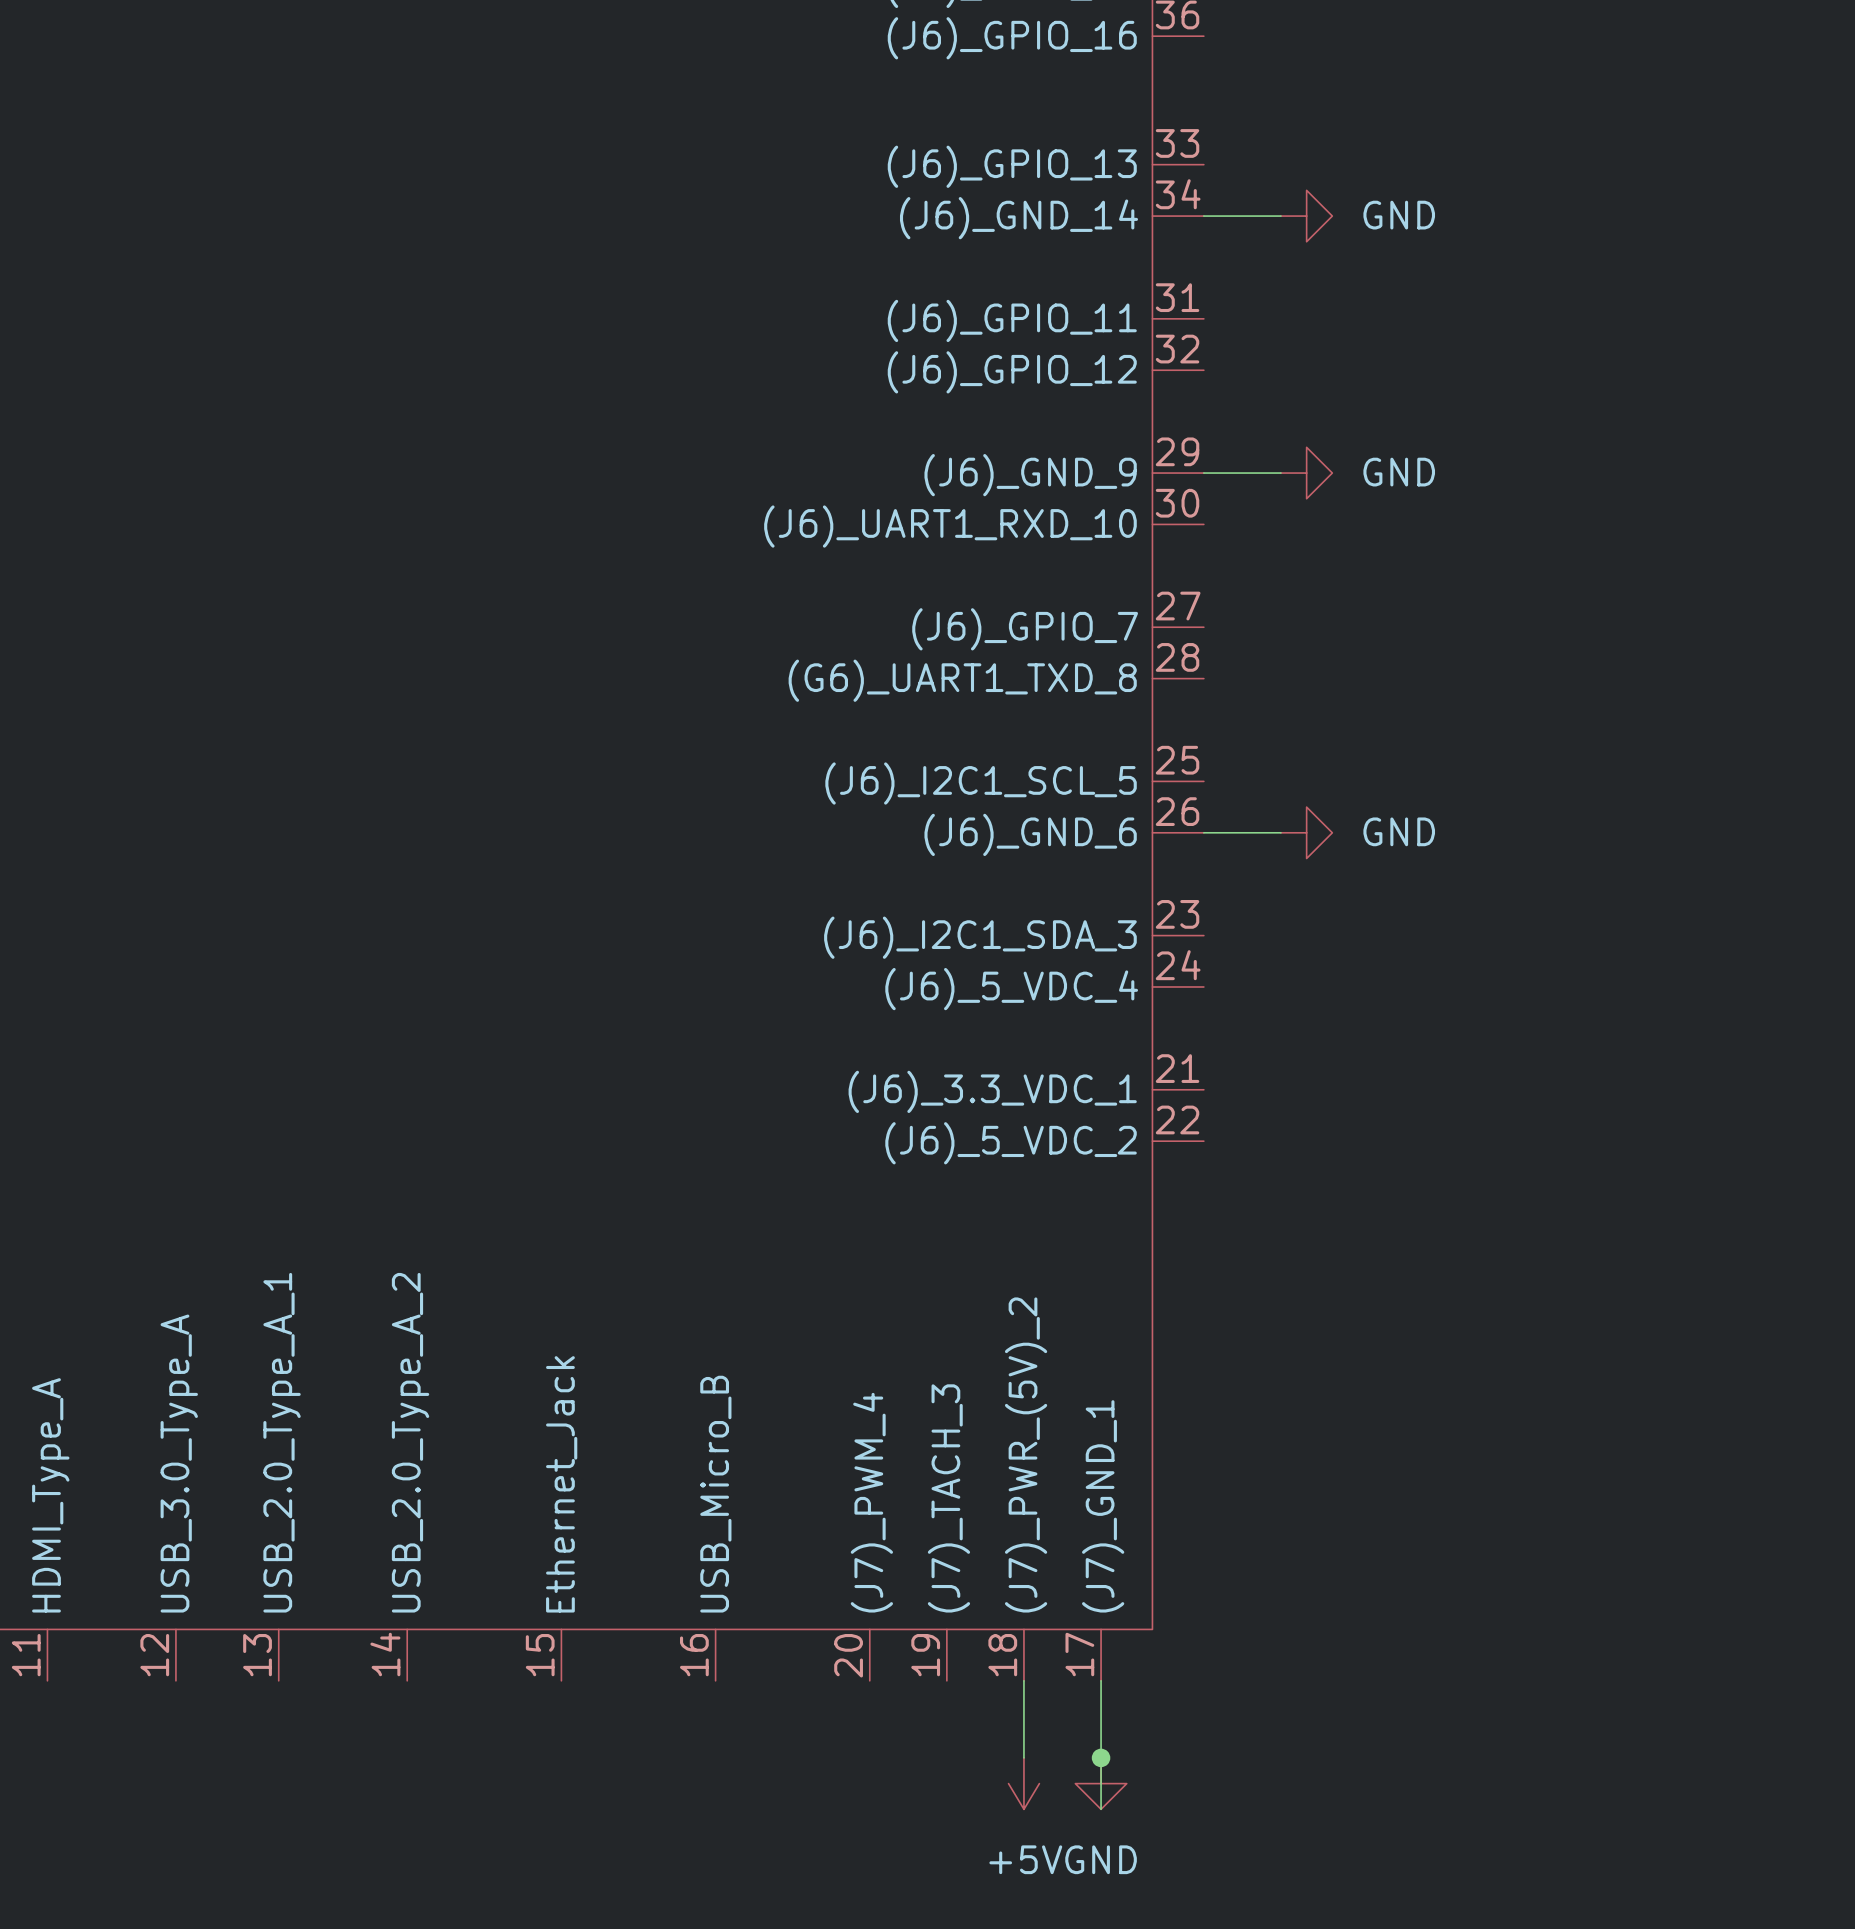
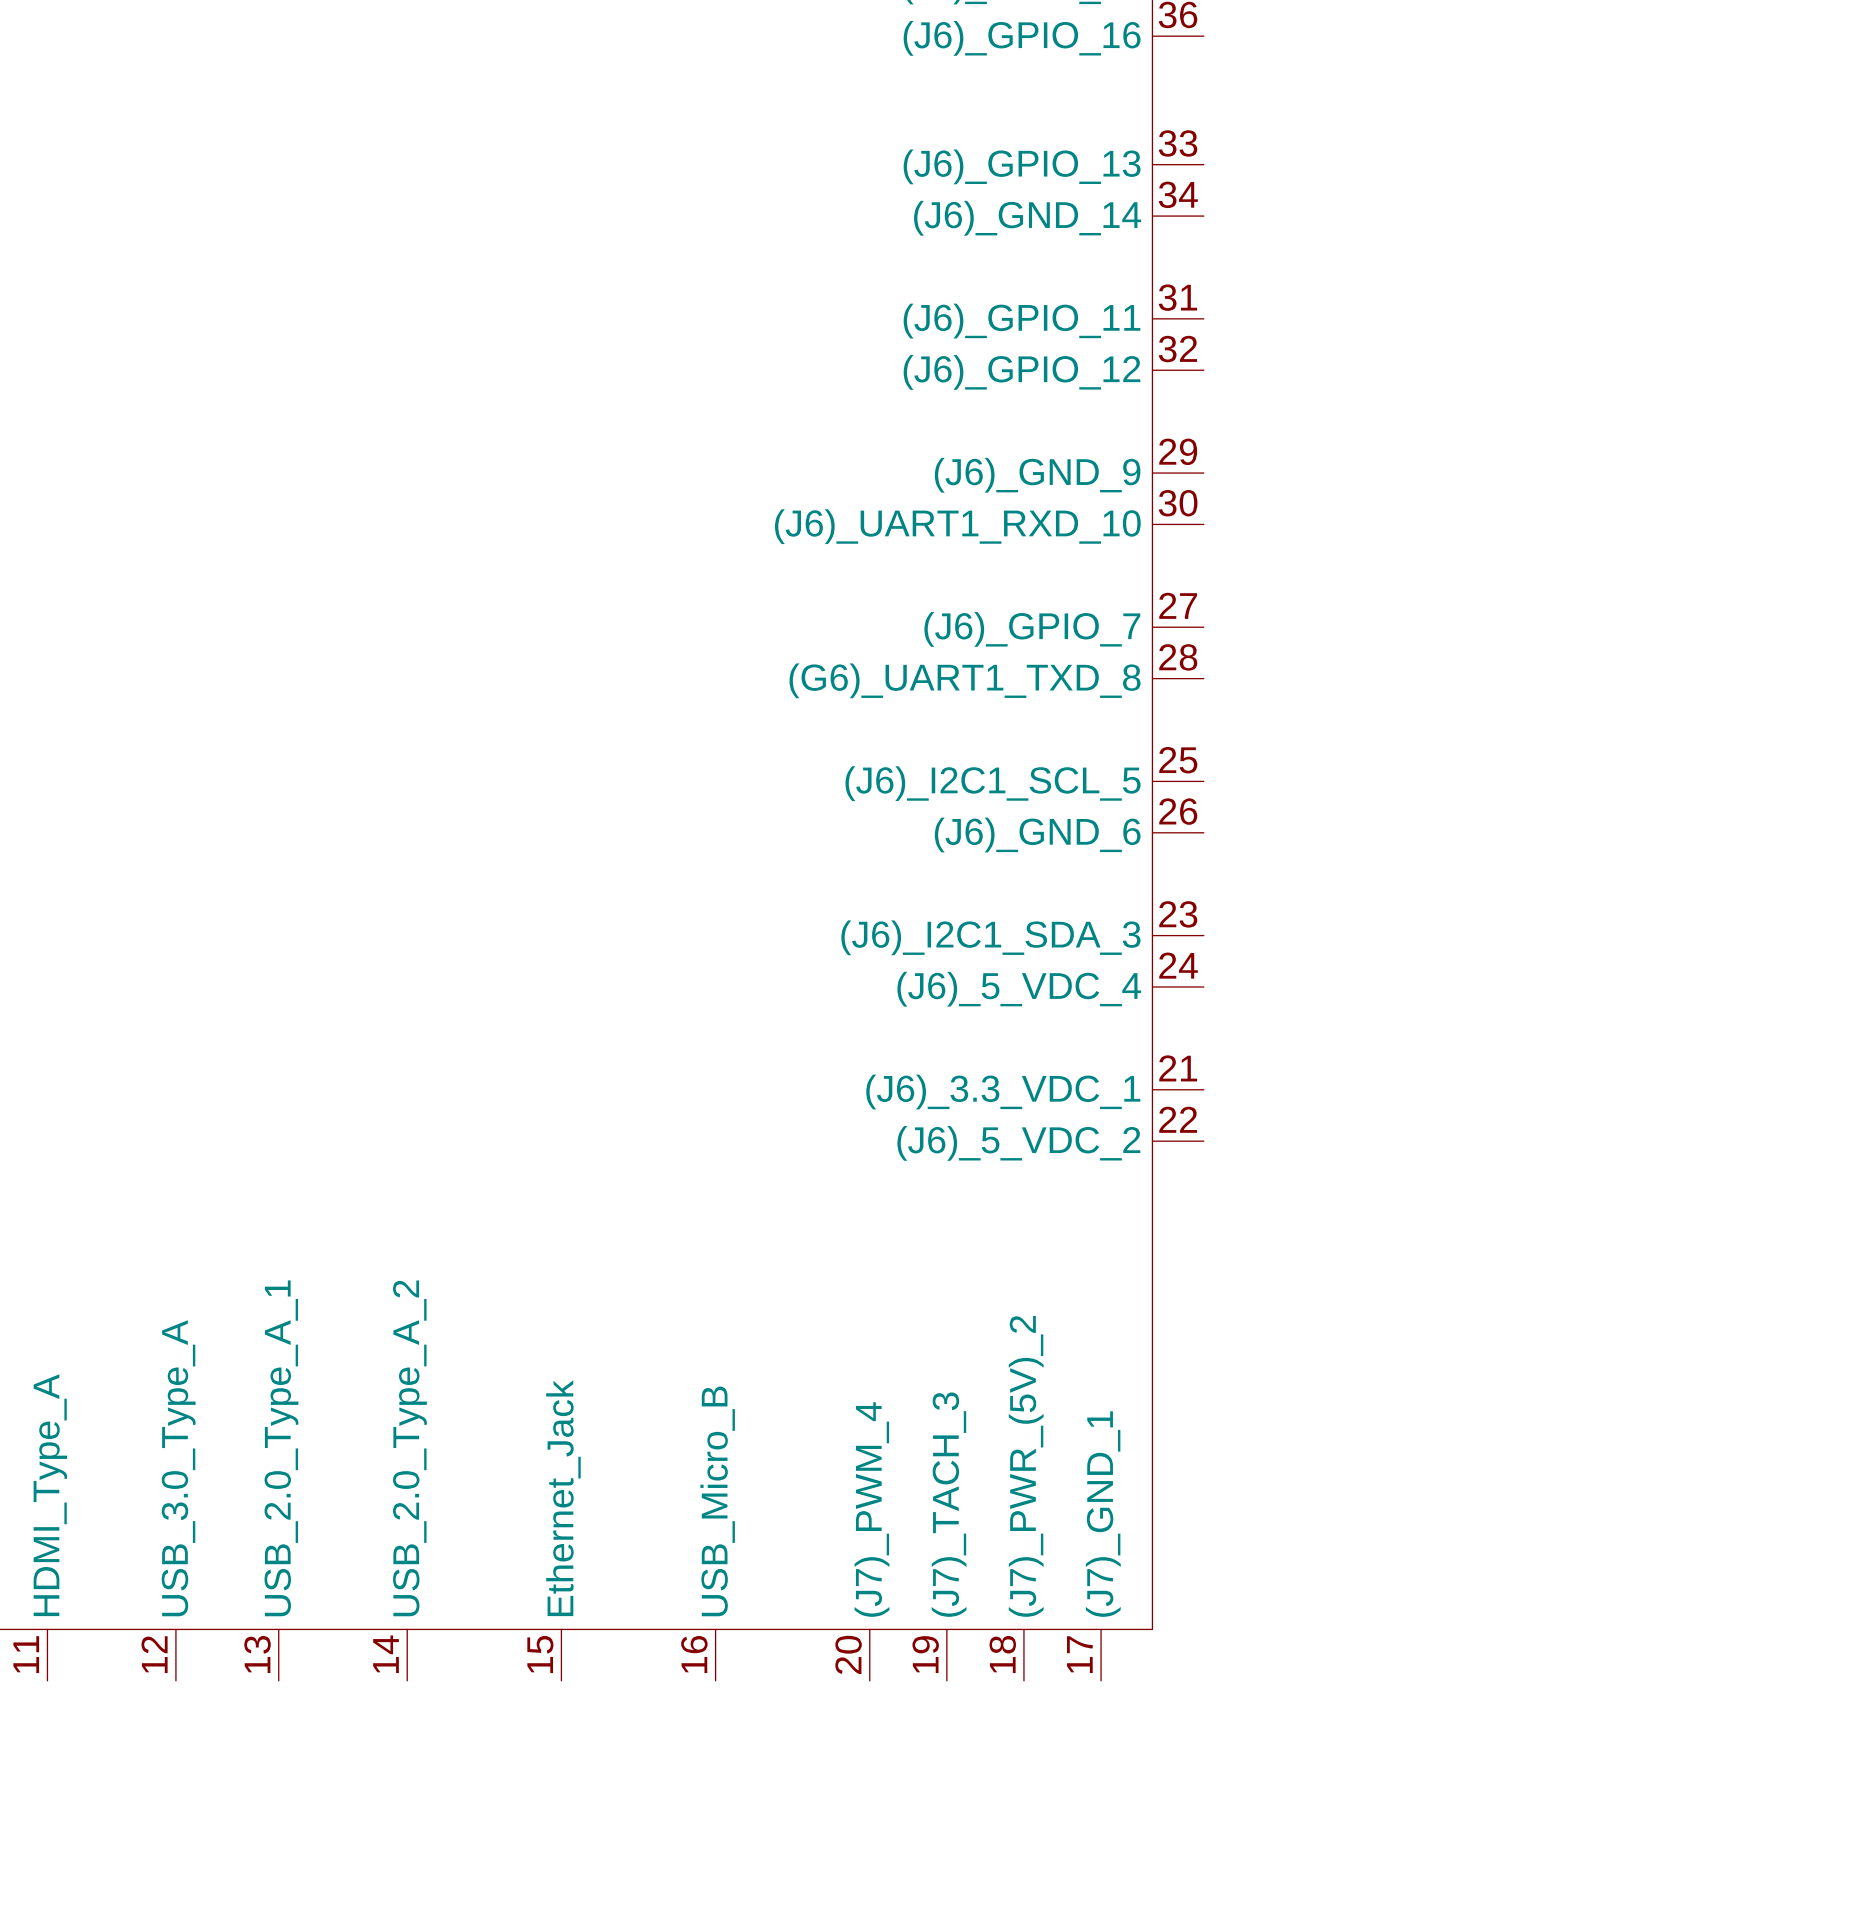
wire: (1203, 216) (1280, 216) -> none
power symbol: GND (1306, 216) -> none
wire: (1203, 473) (1280, 473) -> none
power symbol: GND (1306, 473) -> none
wire: (1203, 832) (1280, 832) -> none
power symbol: GND (1306, 832) -> none
wire: (1023, 1680) (1023, 1757) -> none
wire: (1101, 1680) (1101, 1809) -> none
junction: (1101, 1757) -> none
power symbol: +5V (1023, 1783) -> none
power symbol: GND (1101, 1783) -> none

